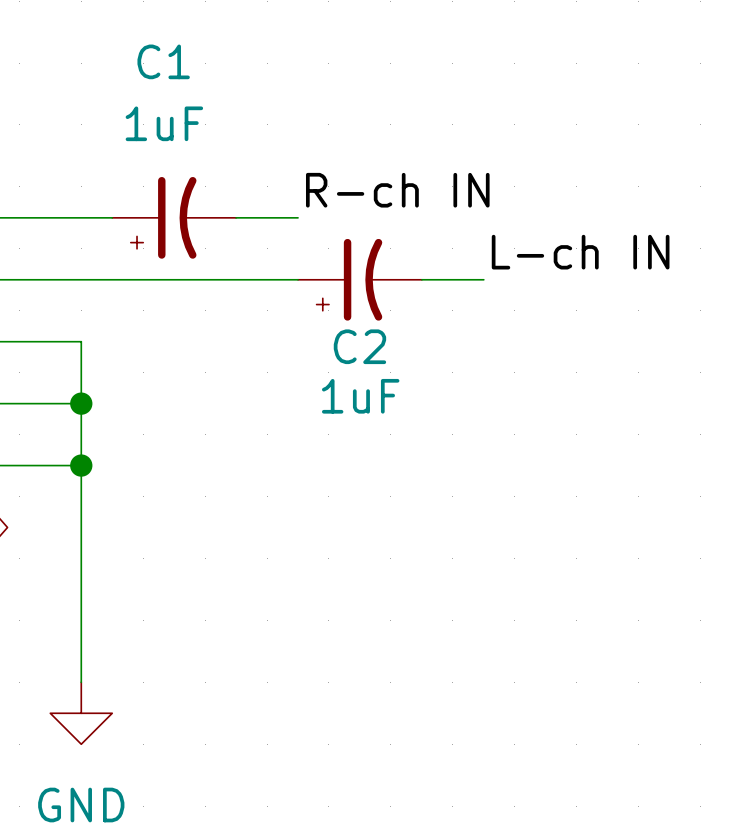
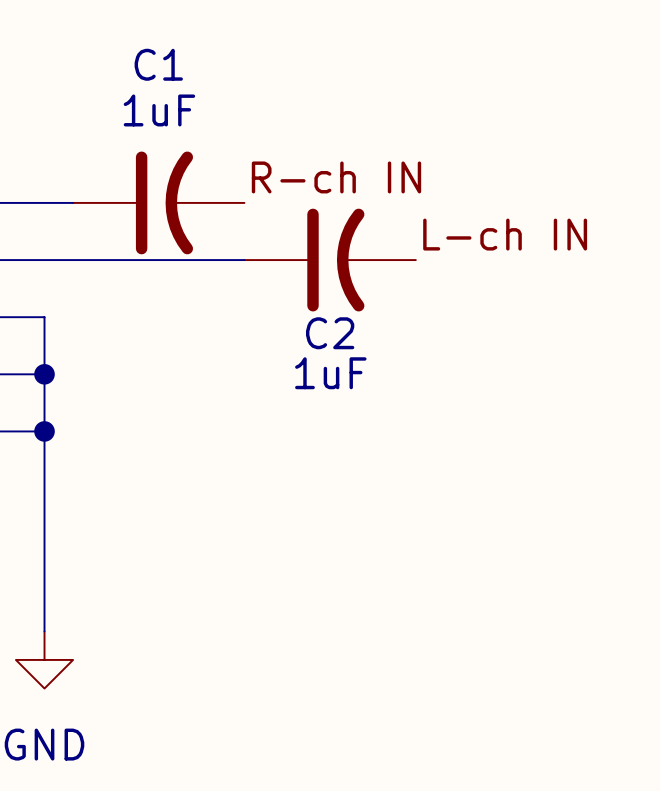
C1 symbol: [112, 176, 237, 259] -> [73, 151, 245, 255]
C2 symbol: [298, 238, 422, 321] -> [244, 208, 416, 312]

